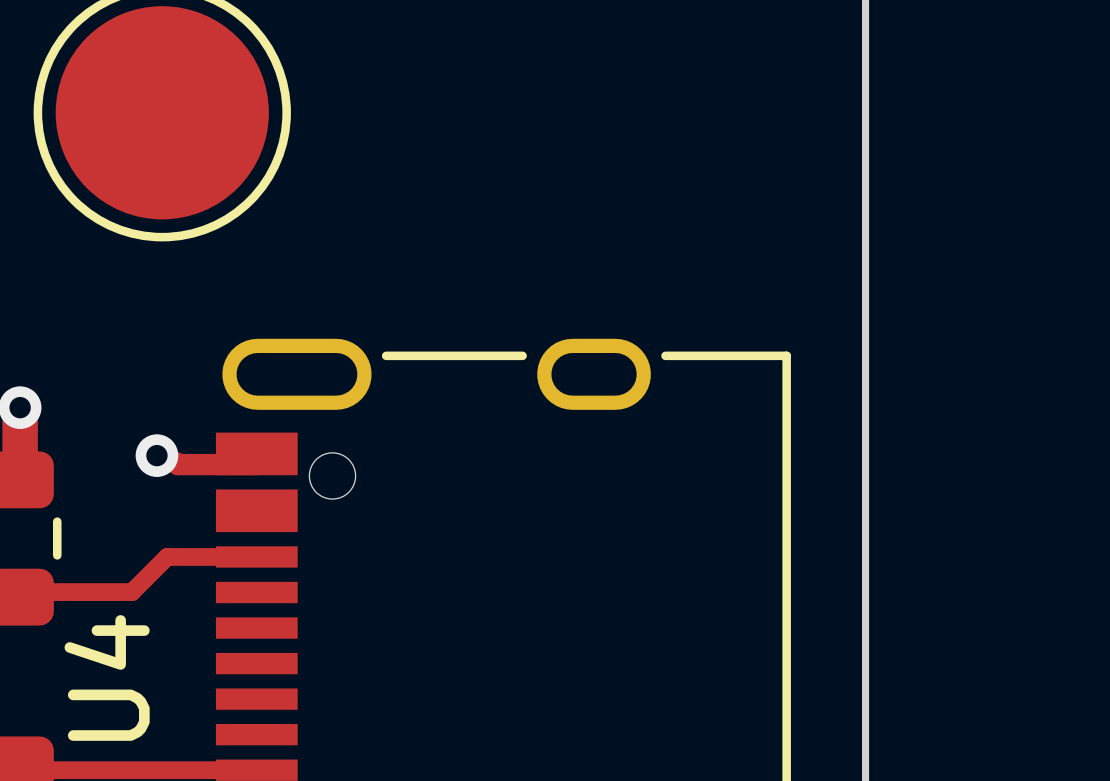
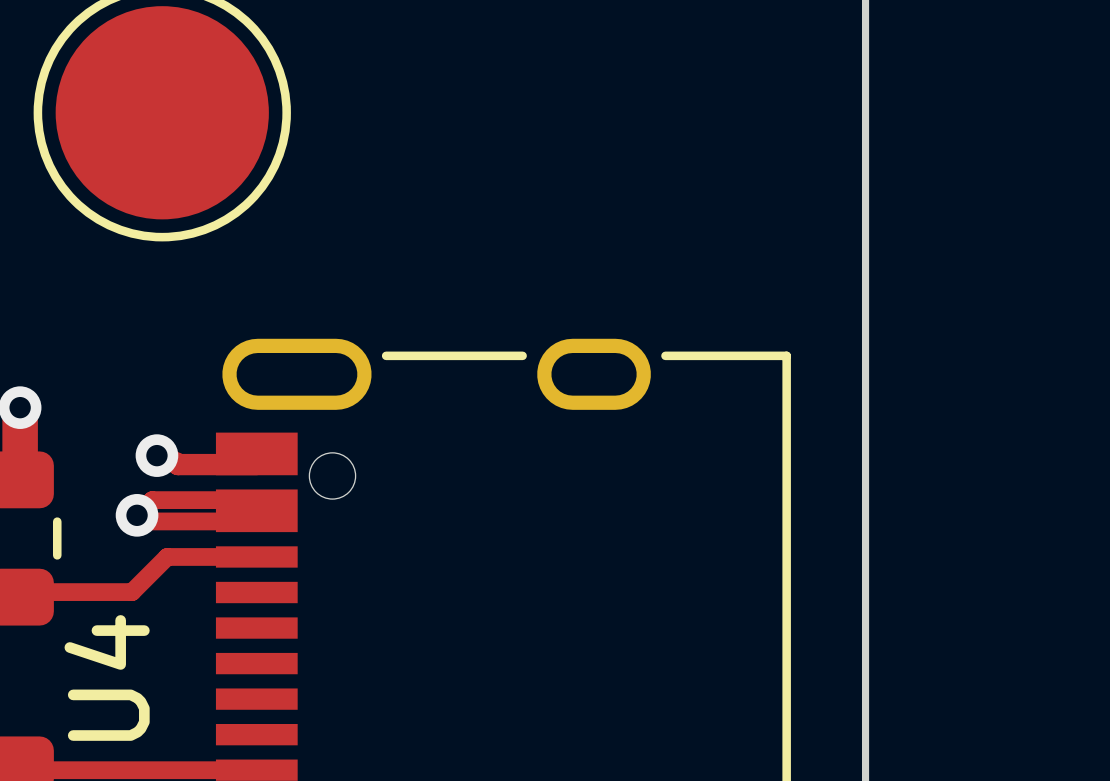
track: none -> (256, 500) (152, 500) (137, 515) (143, 521) (256, 521)
via: none -> (137, 515)

